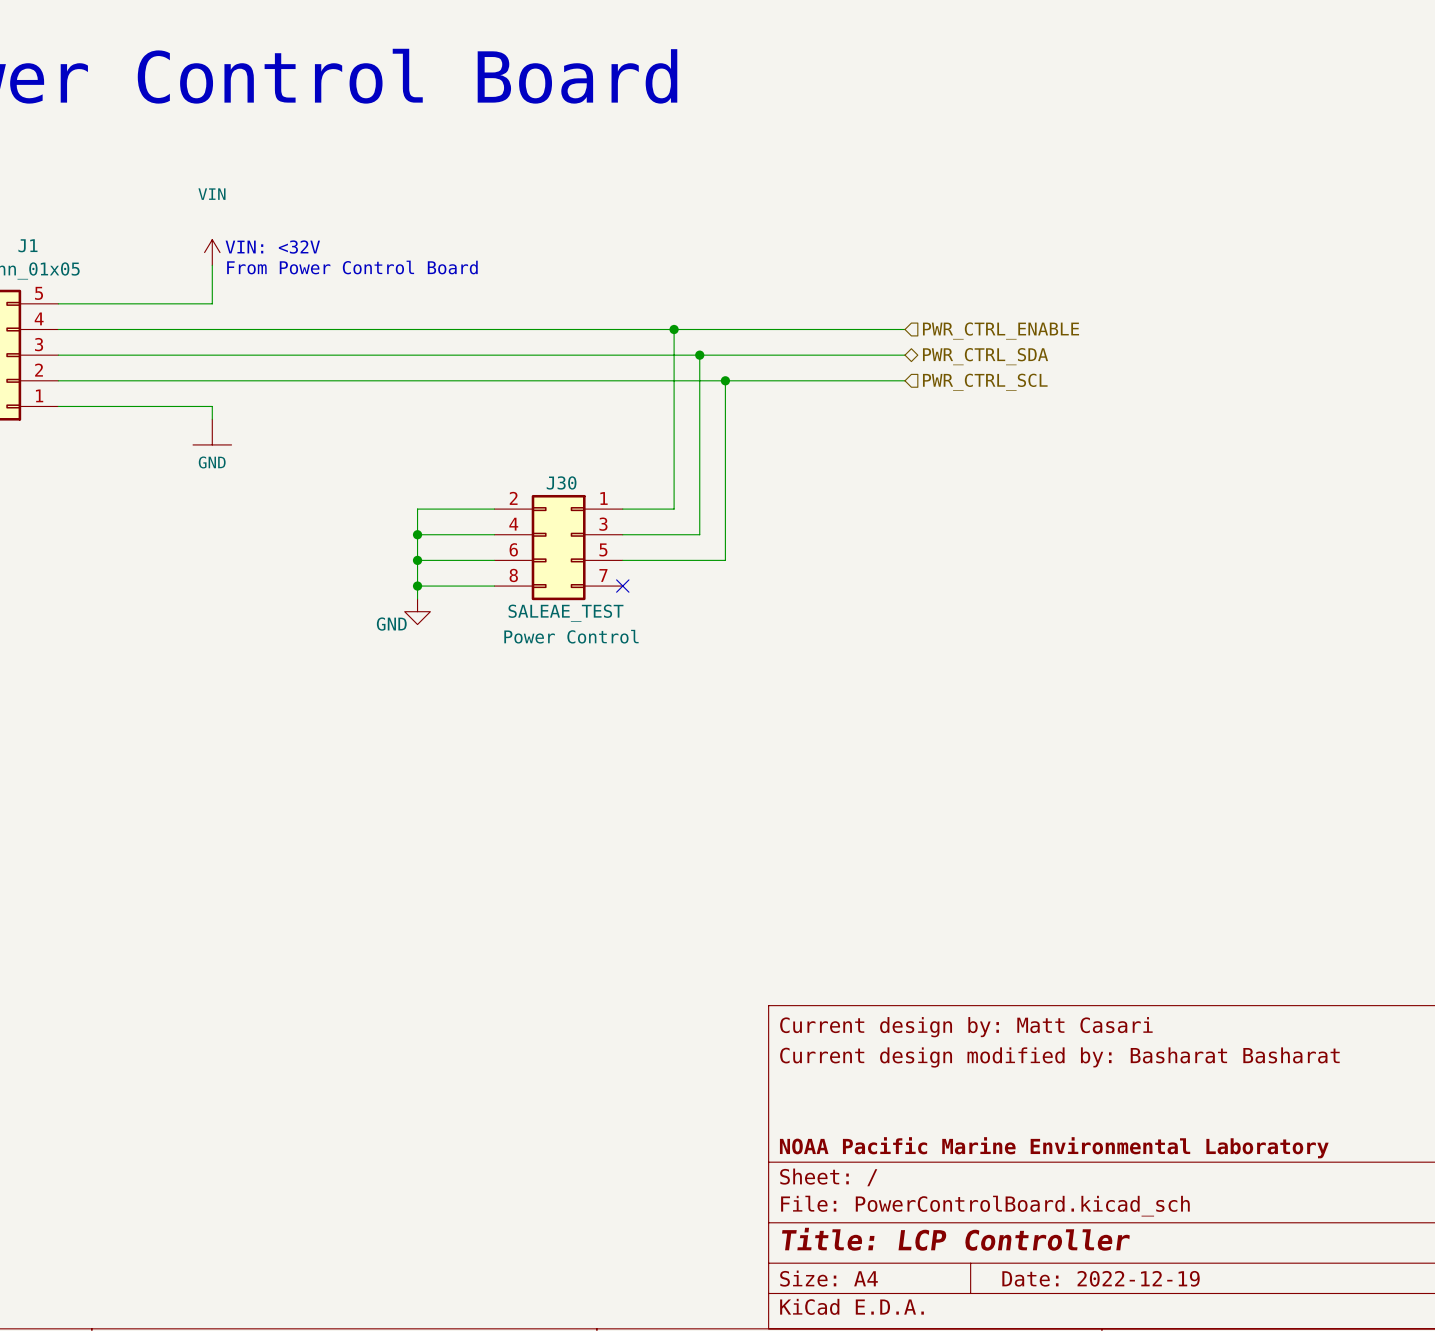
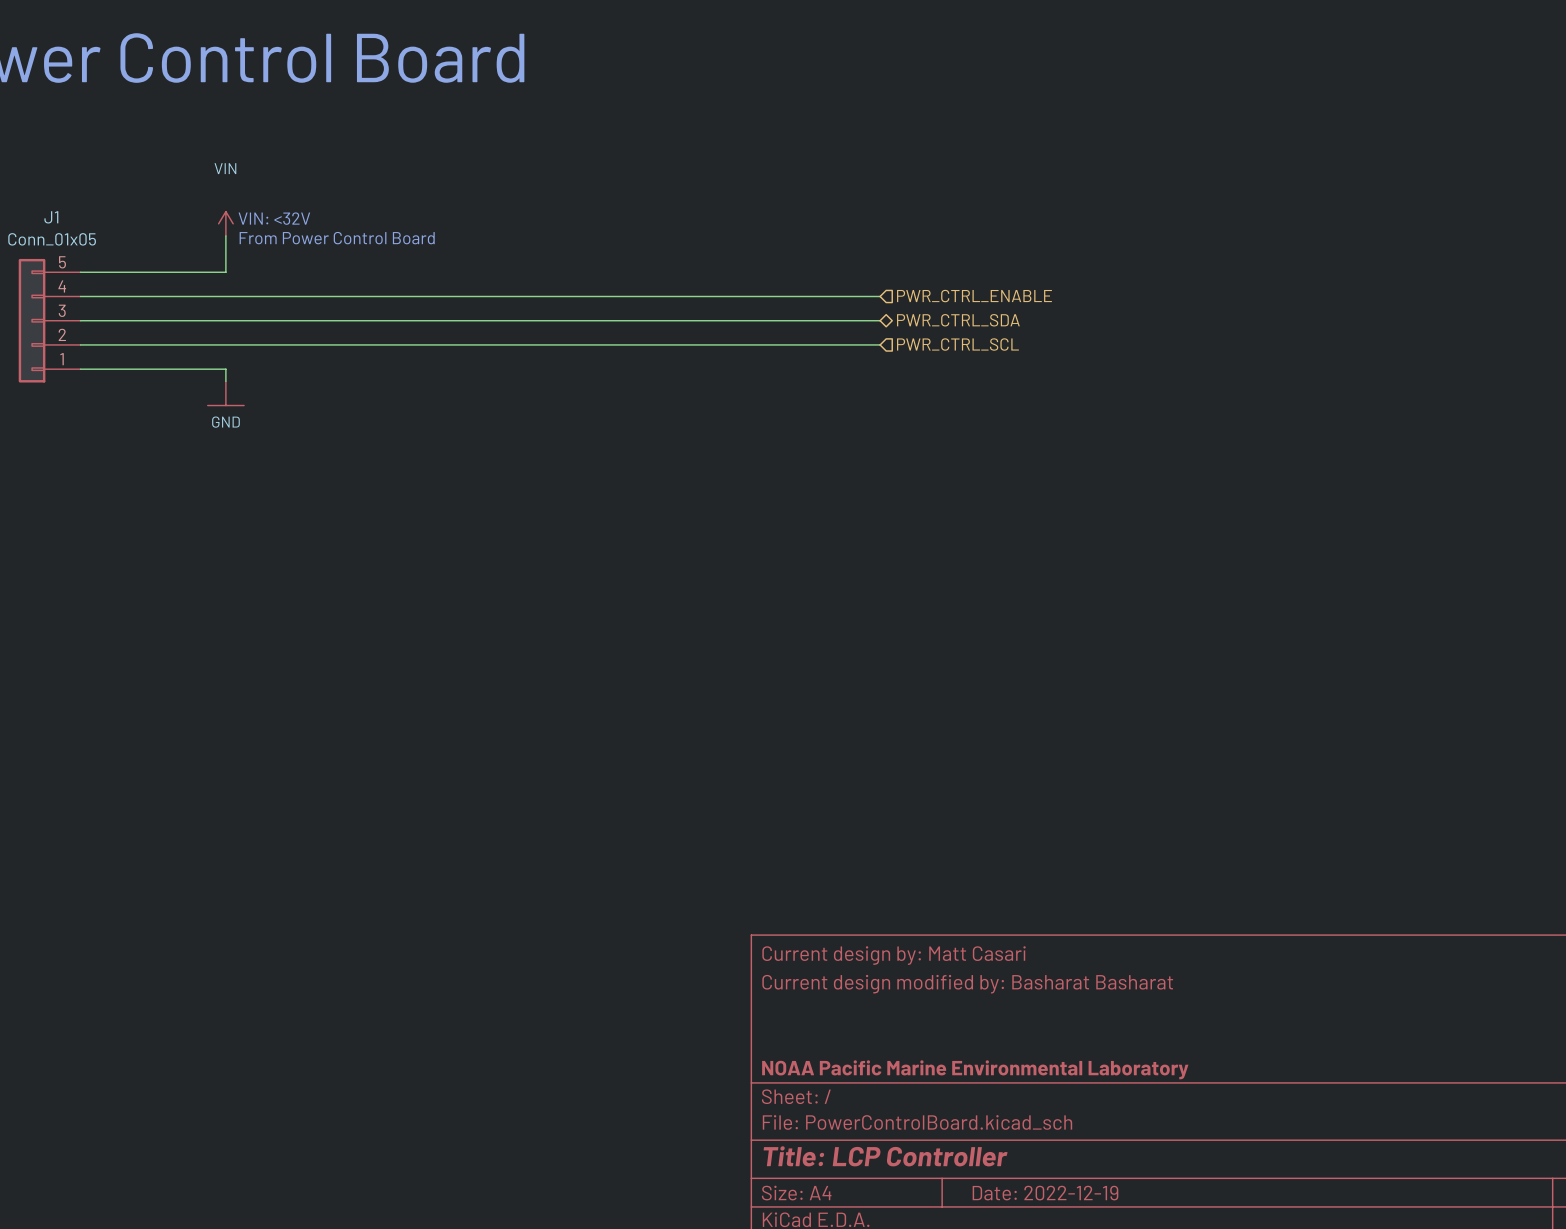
wire: (674, 329) (674, 509) (622, 509) -> none
junction: (674, 329) -> none
wire: (699, 355) (699, 534) (622, 534) -> none
junction: (699, 355) -> none
wire: (725, 380) (725, 560) (622, 560) -> none
junction: (725, 380) -> none
wire: (494, 509) (417, 509) (417, 598) -> none
wire: (417, 534) (494, 534) -> none
junction: (417, 534) -> none
J30: SALEAE_TEST (558, 547) -> none
wire: (417, 560) (494, 560) -> none
junction: (417, 560) -> none
wire: (417, 586) (494, 586) -> none
junction: (417, 586) -> none
no-connect mark: (622, 586) -> none
power symbol: GND (417, 611) -> none

